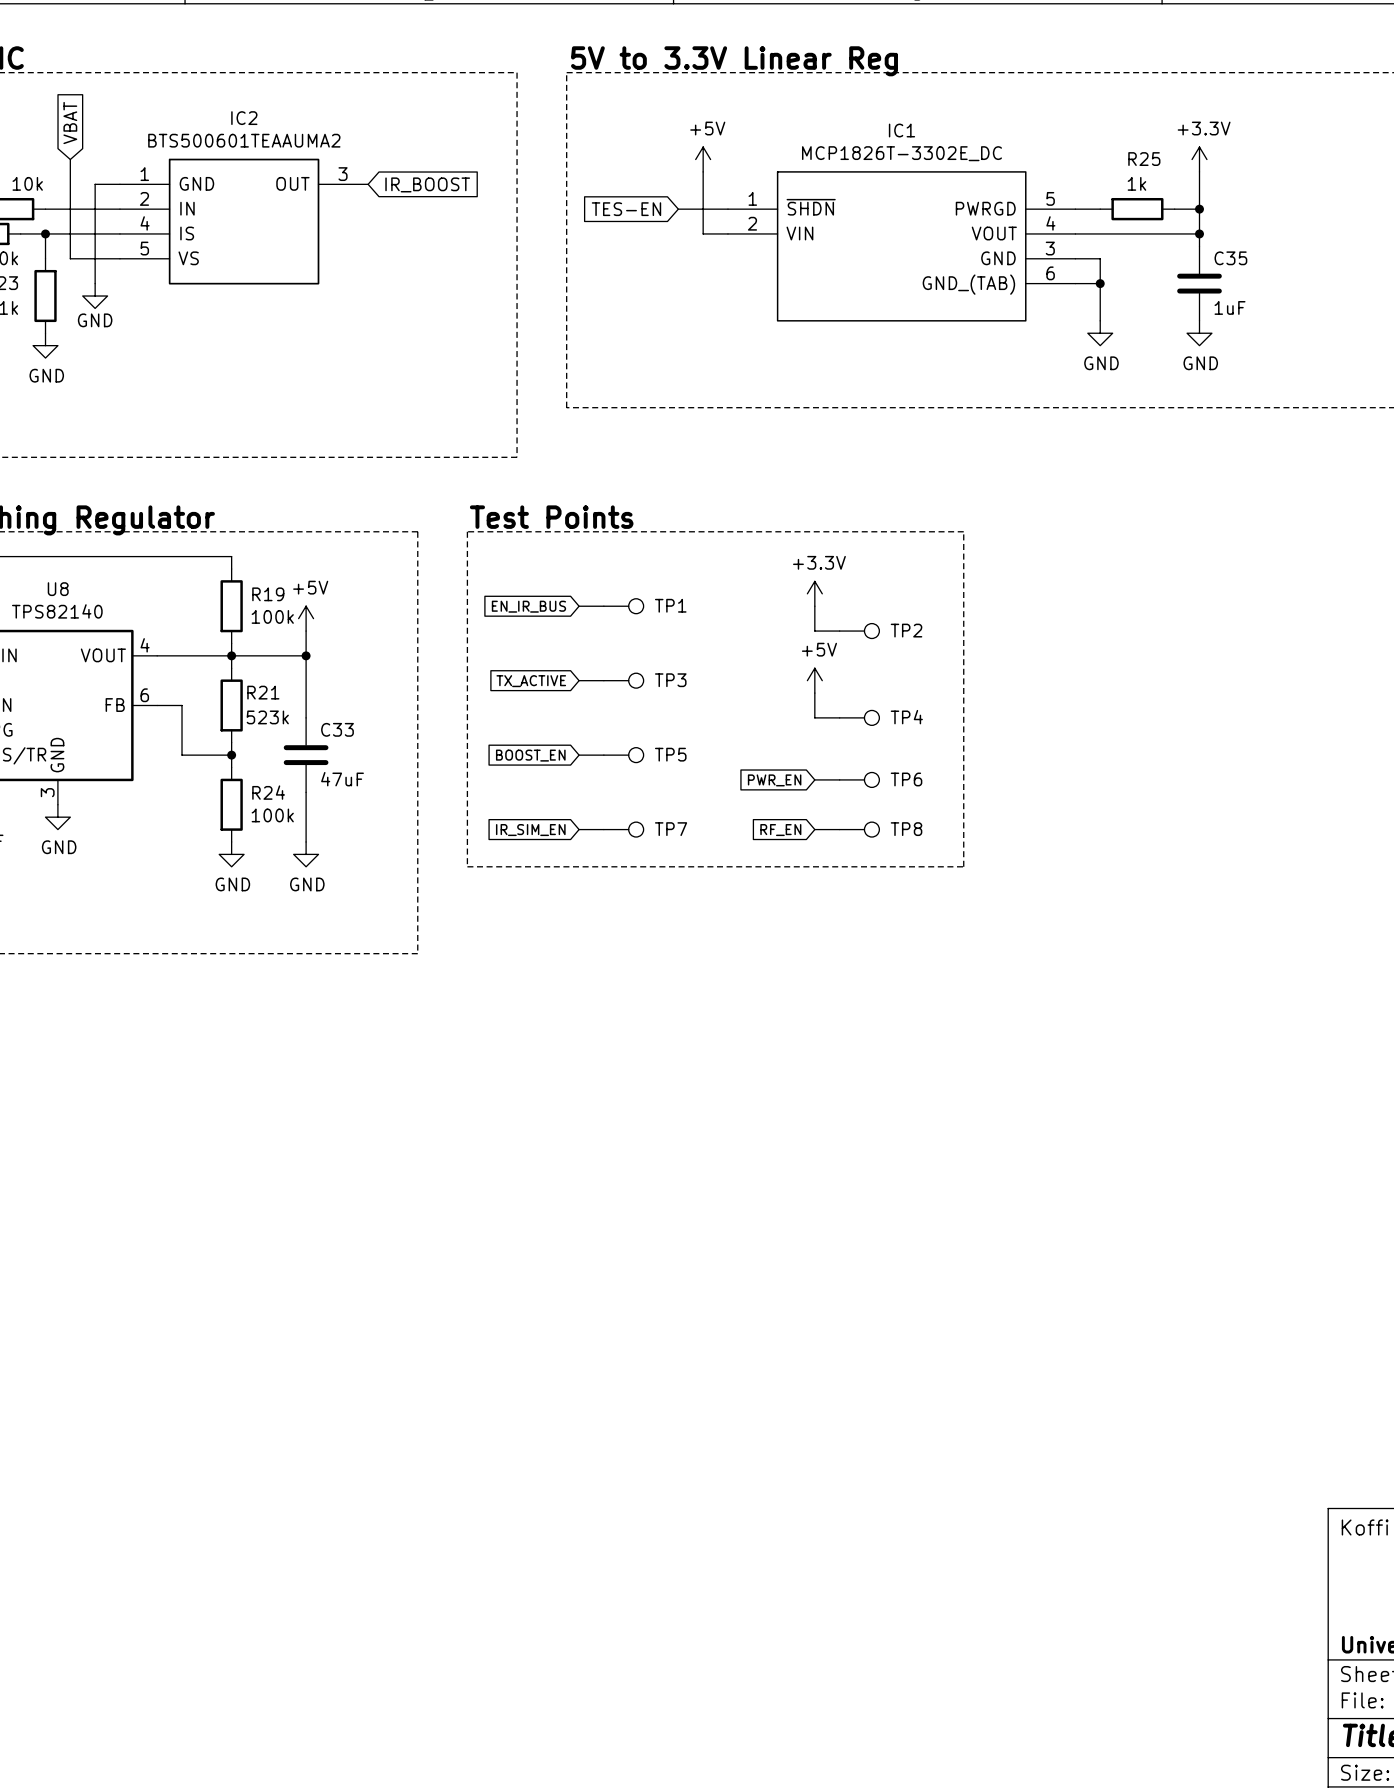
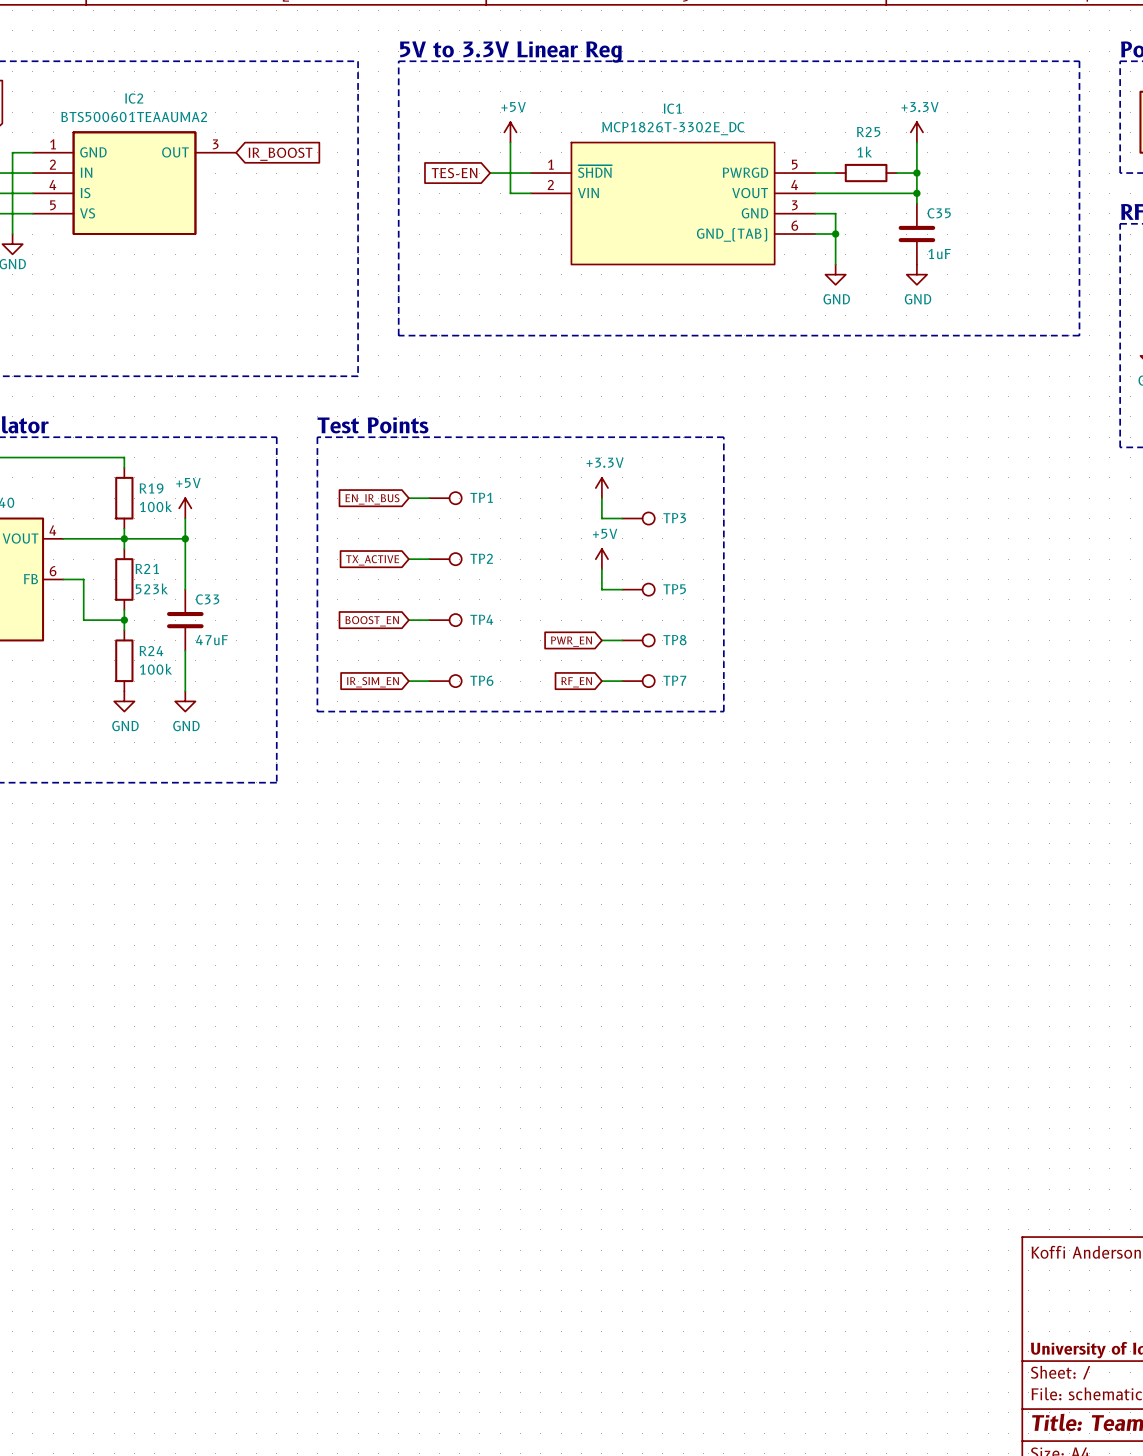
TP2 name: TP2 (906, 630) -> TP3 (674, 518)
TP3 name: TP3 (670, 680) -> TP2 (481, 558)
TP4 name: TP4 (906, 717) -> TP5 (674, 589)
TP5 name: TP5 (670, 754) -> TP4 (481, 619)
TP6 name: TP6 (906, 779) -> TP8 (674, 640)
TP7 name: TP7 (671, 829) -> TP6 (481, 680)
TP8 name: TP8 (906, 829) -> TP7 (674, 680)

